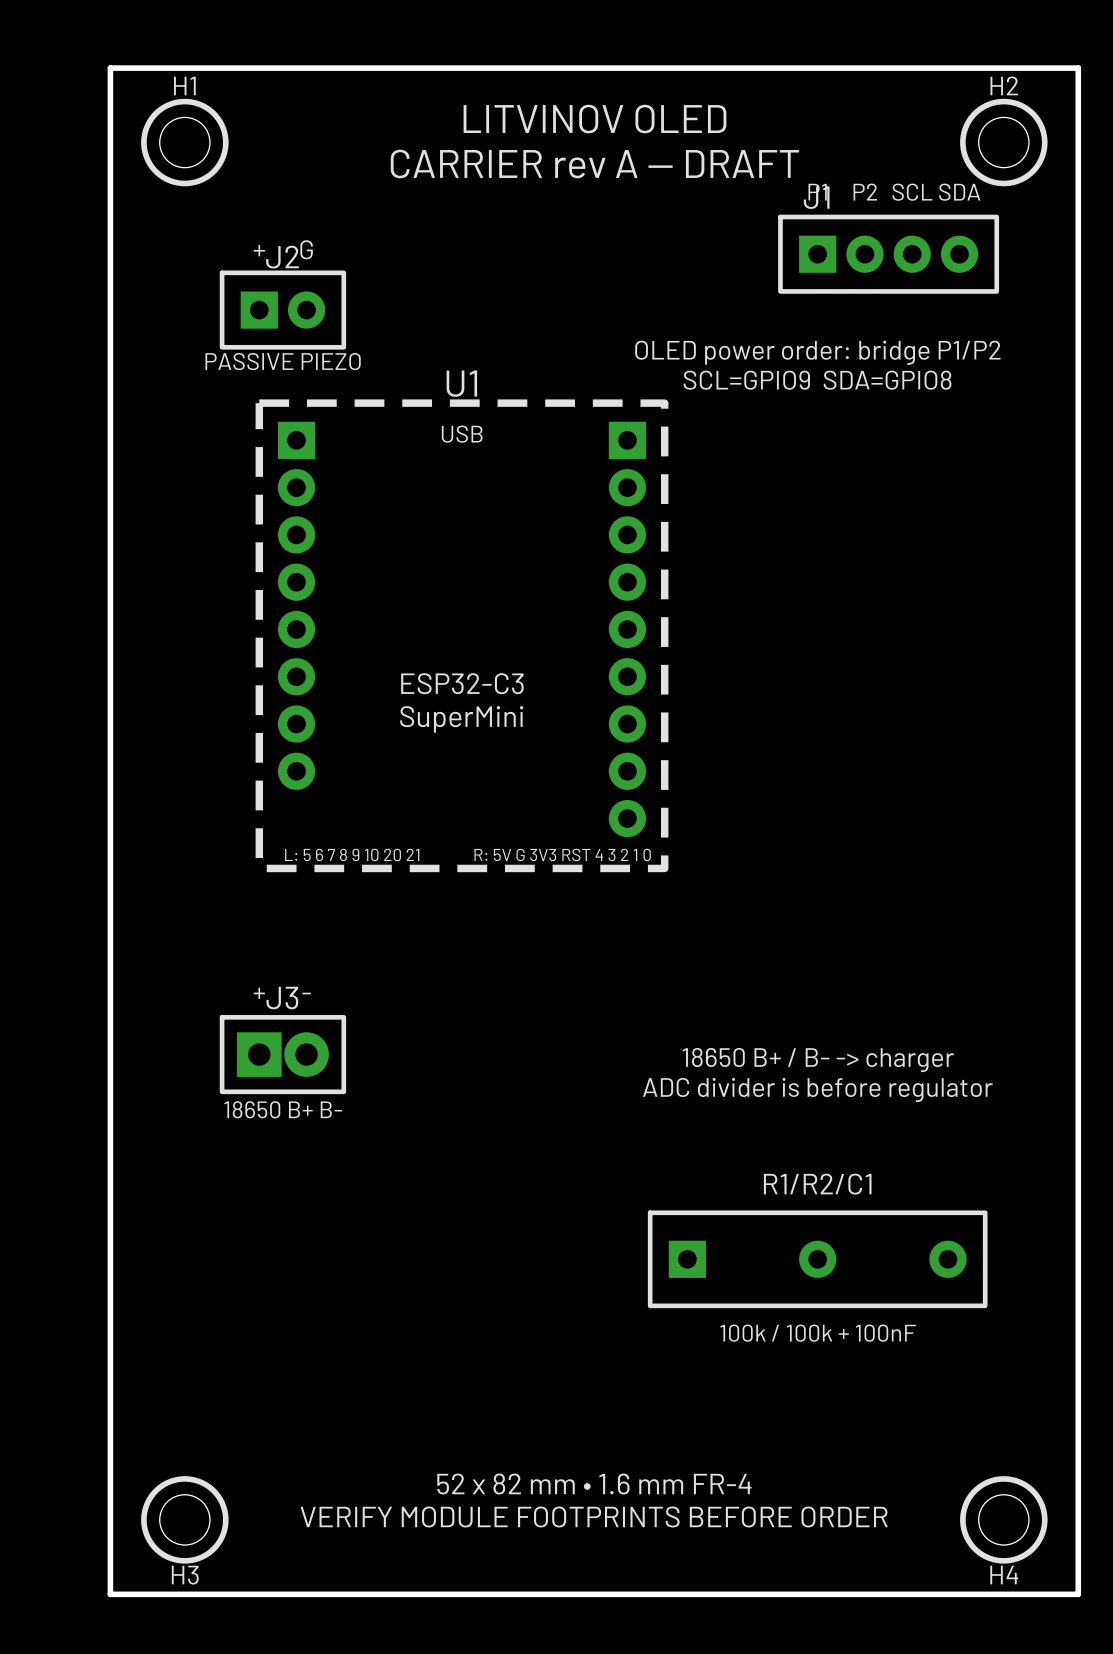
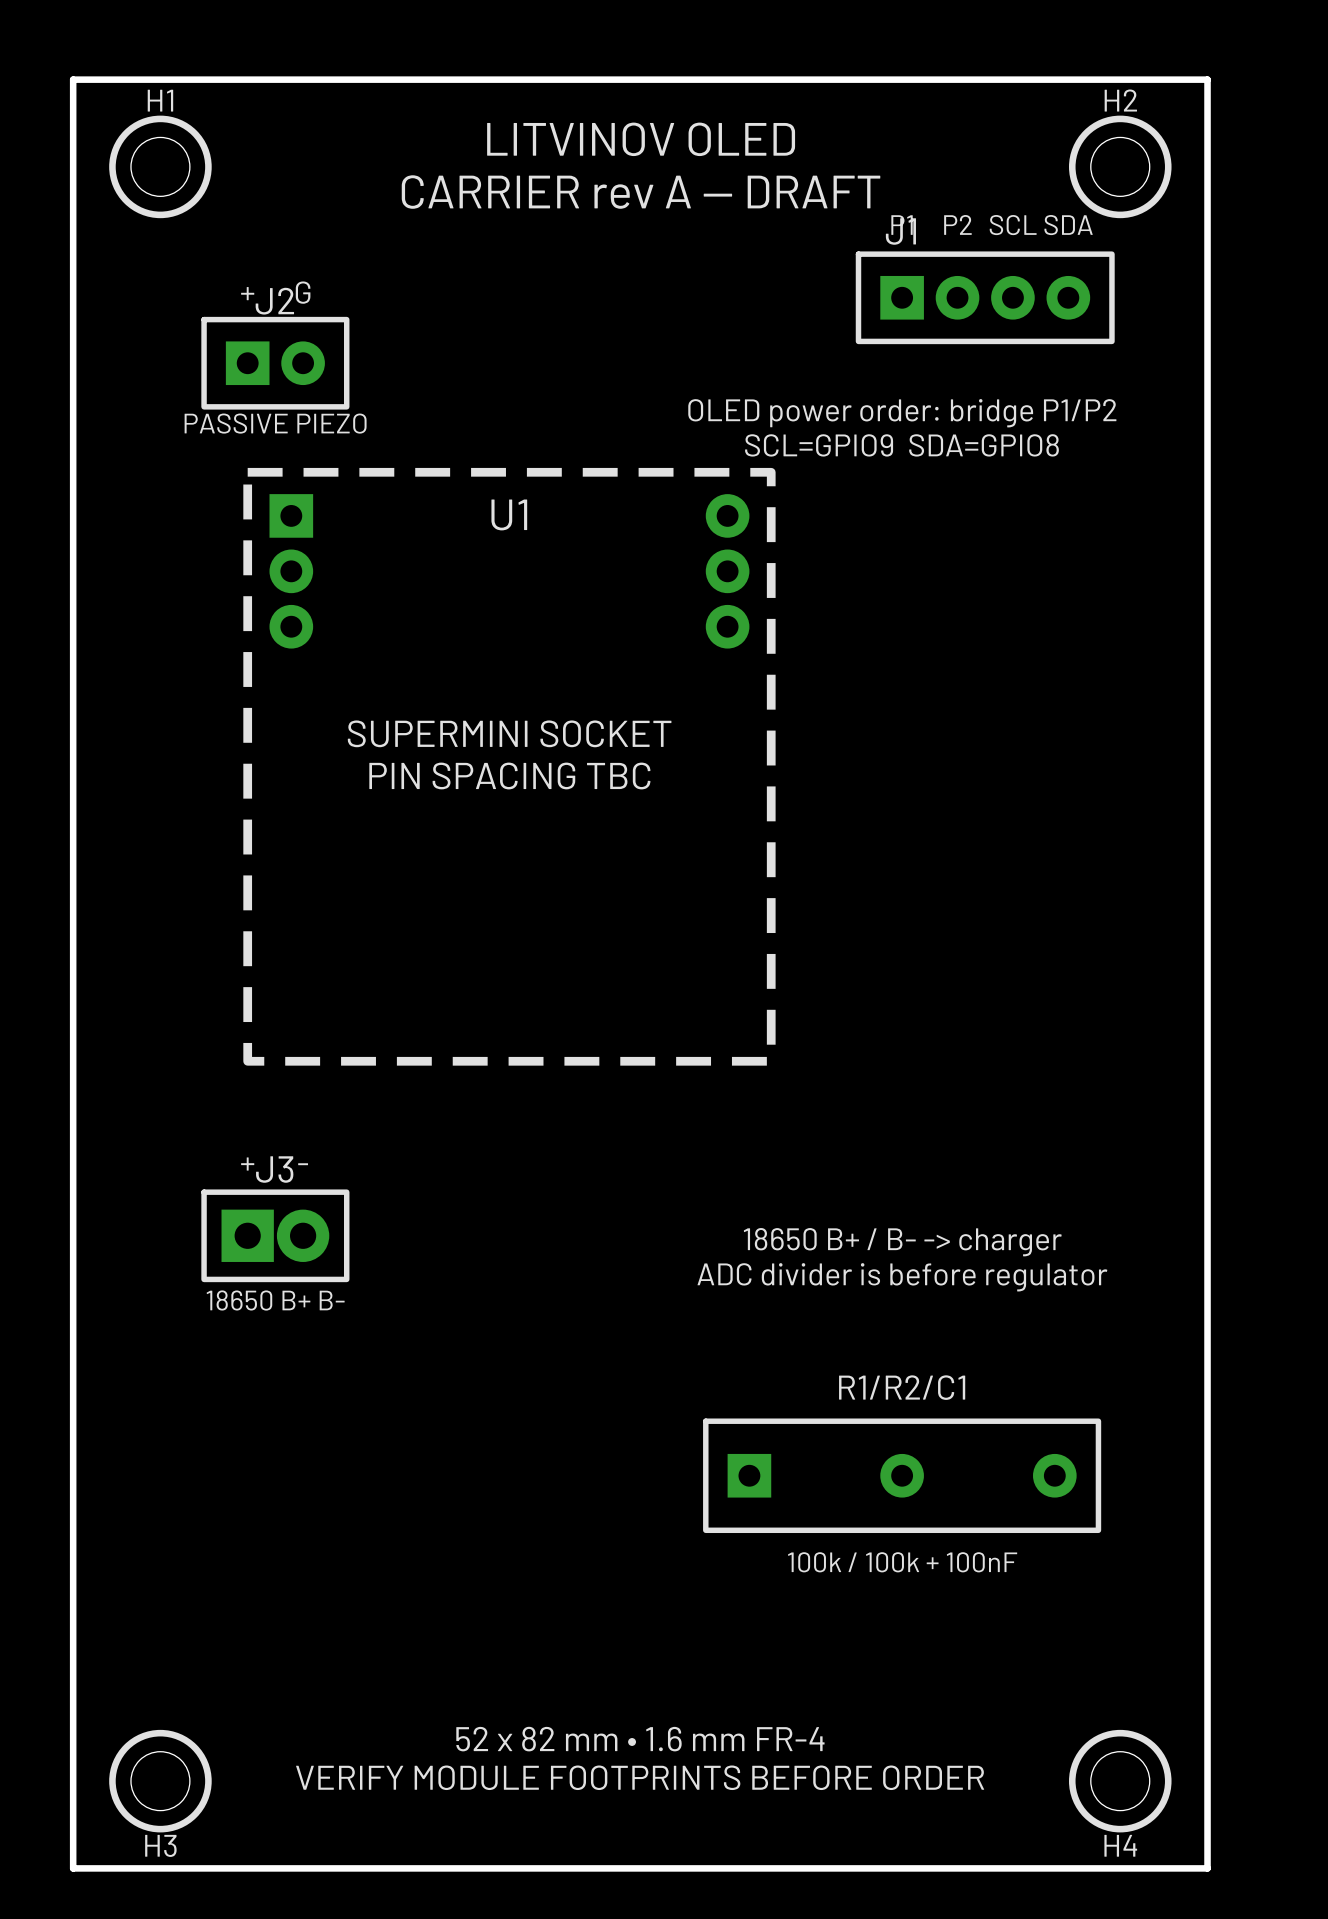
U1 footprint: [255, 399, 669, 873] -> [243, 467, 776, 1066]

